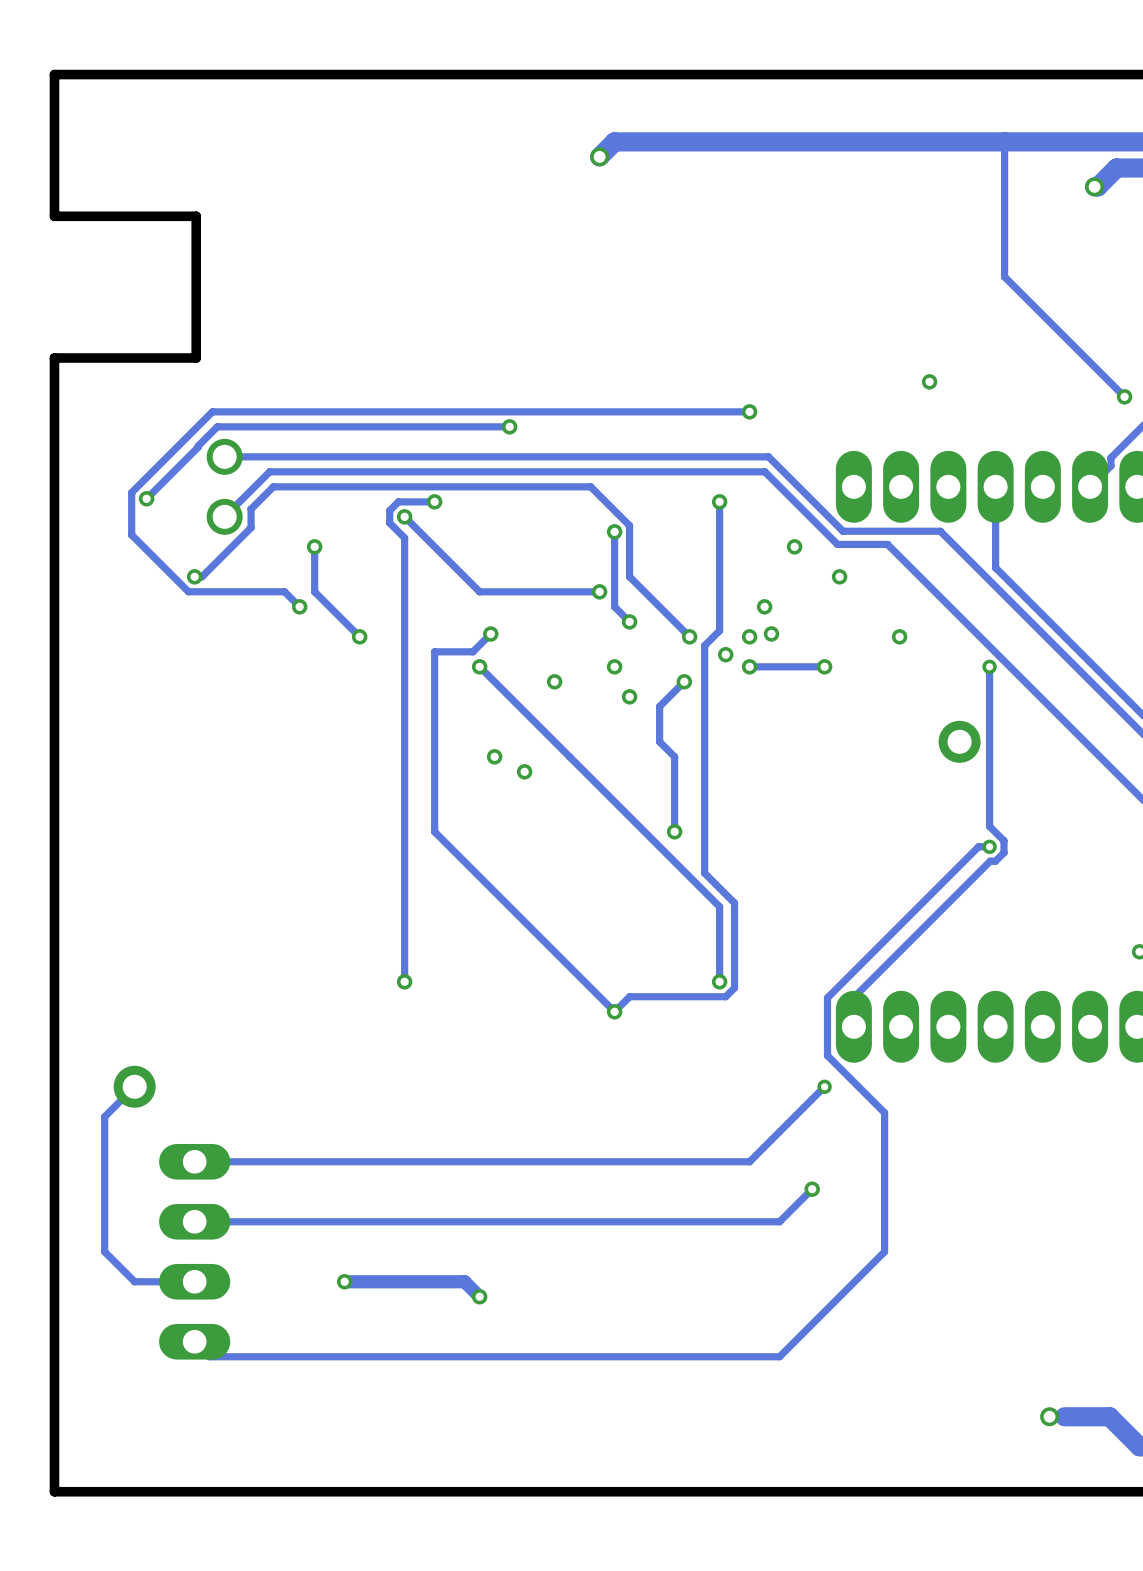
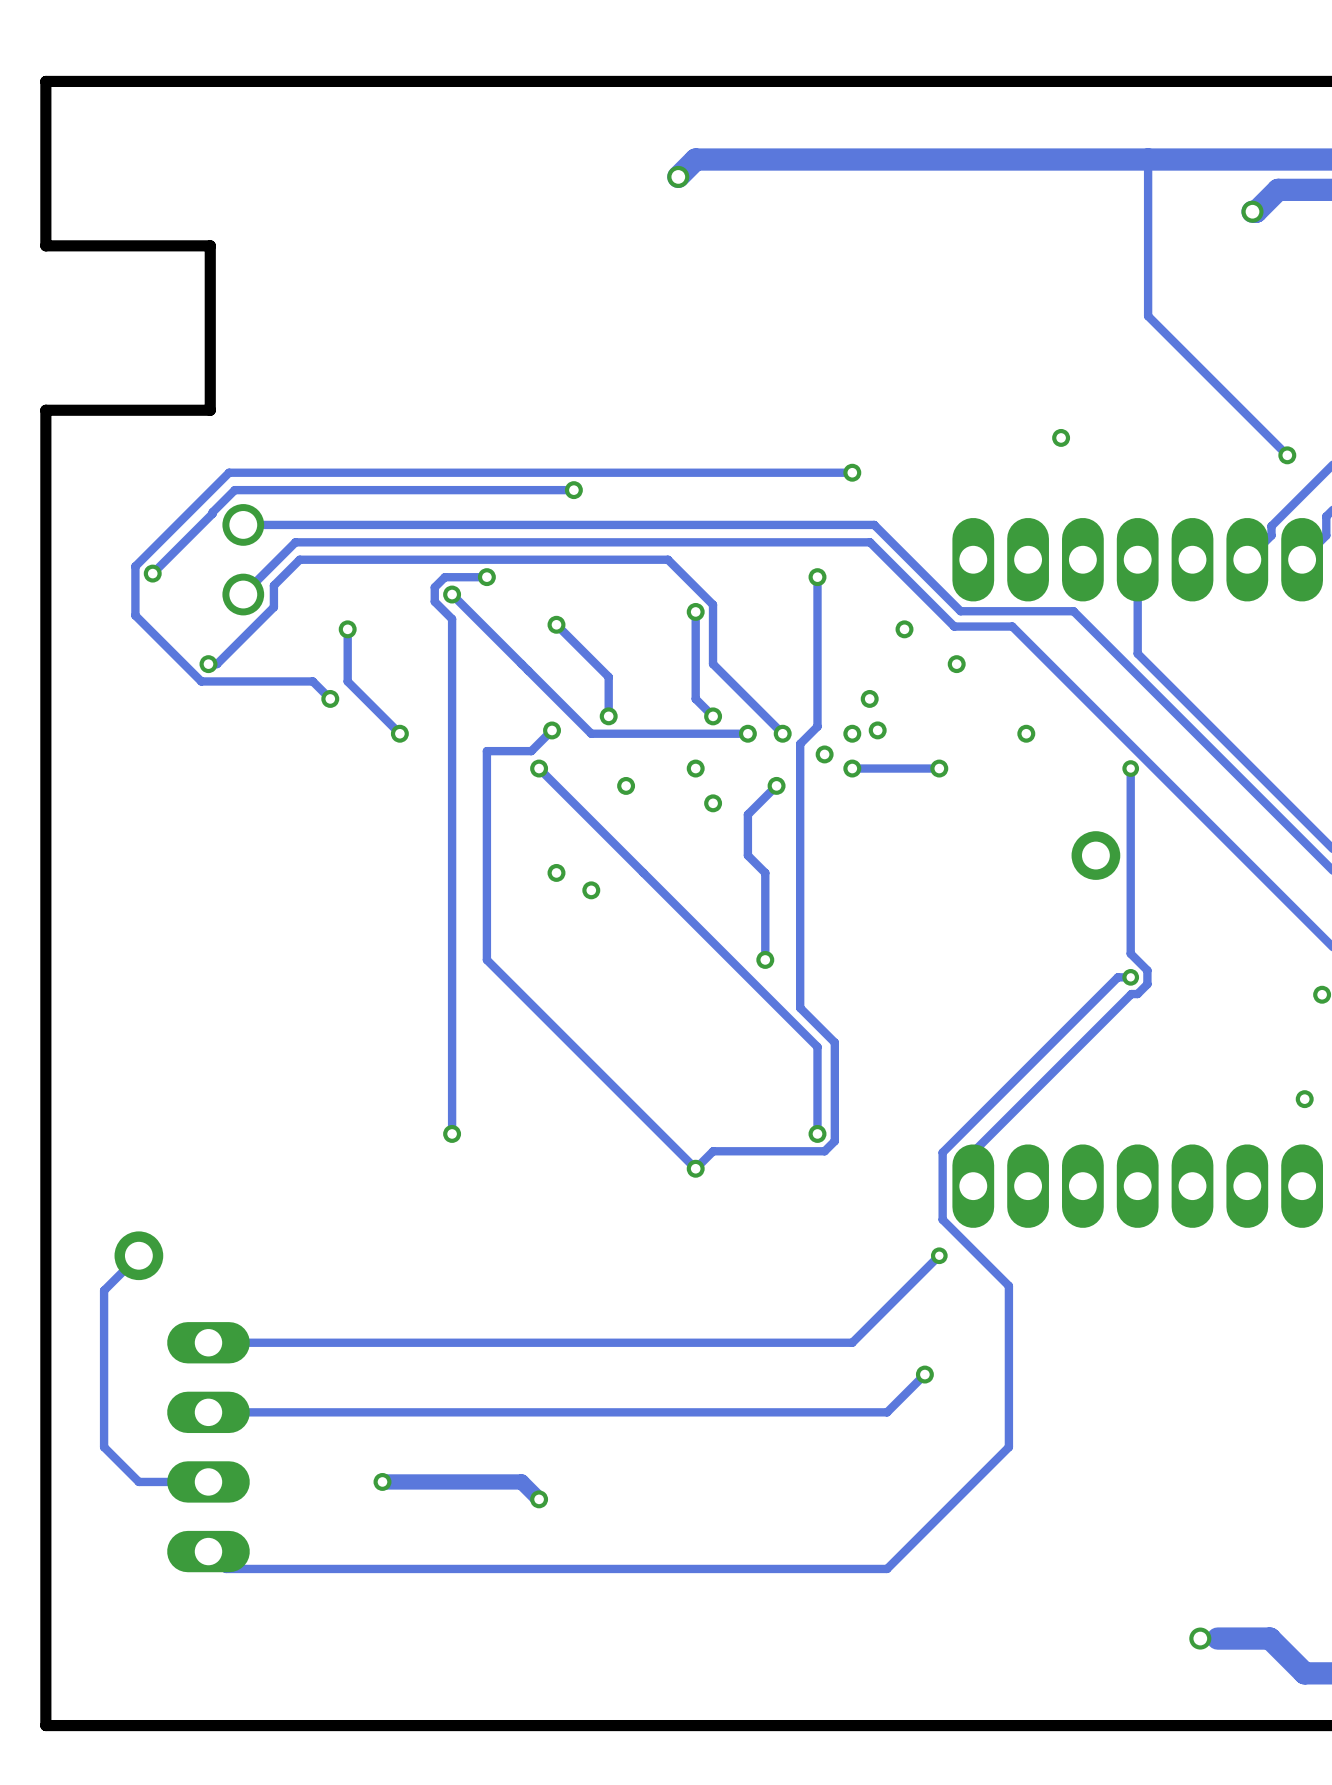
track: none -> (556, 624) (608, 676) (608, 716)
via: none -> (556, 624)
track: (599, 591) (479, 591) -> (747, 733) (591, 733) (539, 681)
via: (599, 591) -> none
via: none -> (608, 716)
via: none -> (747, 733)

